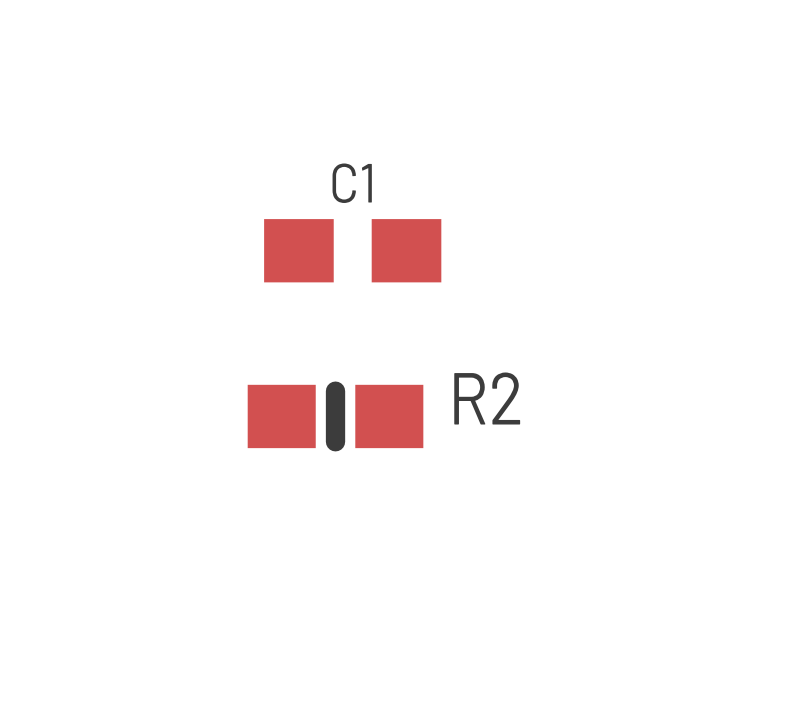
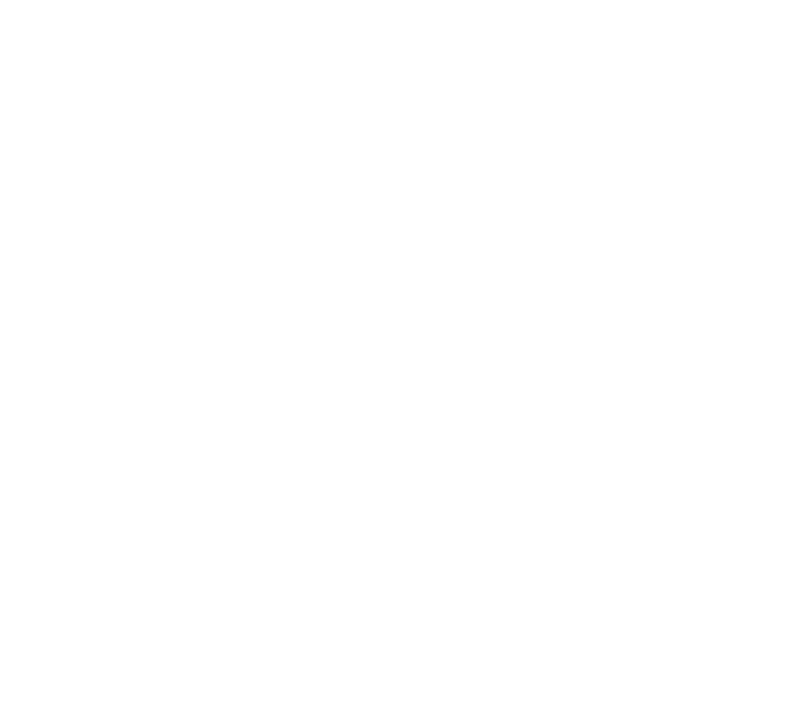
C1: (352, 250) -> none
R2: (335, 416) -> none

